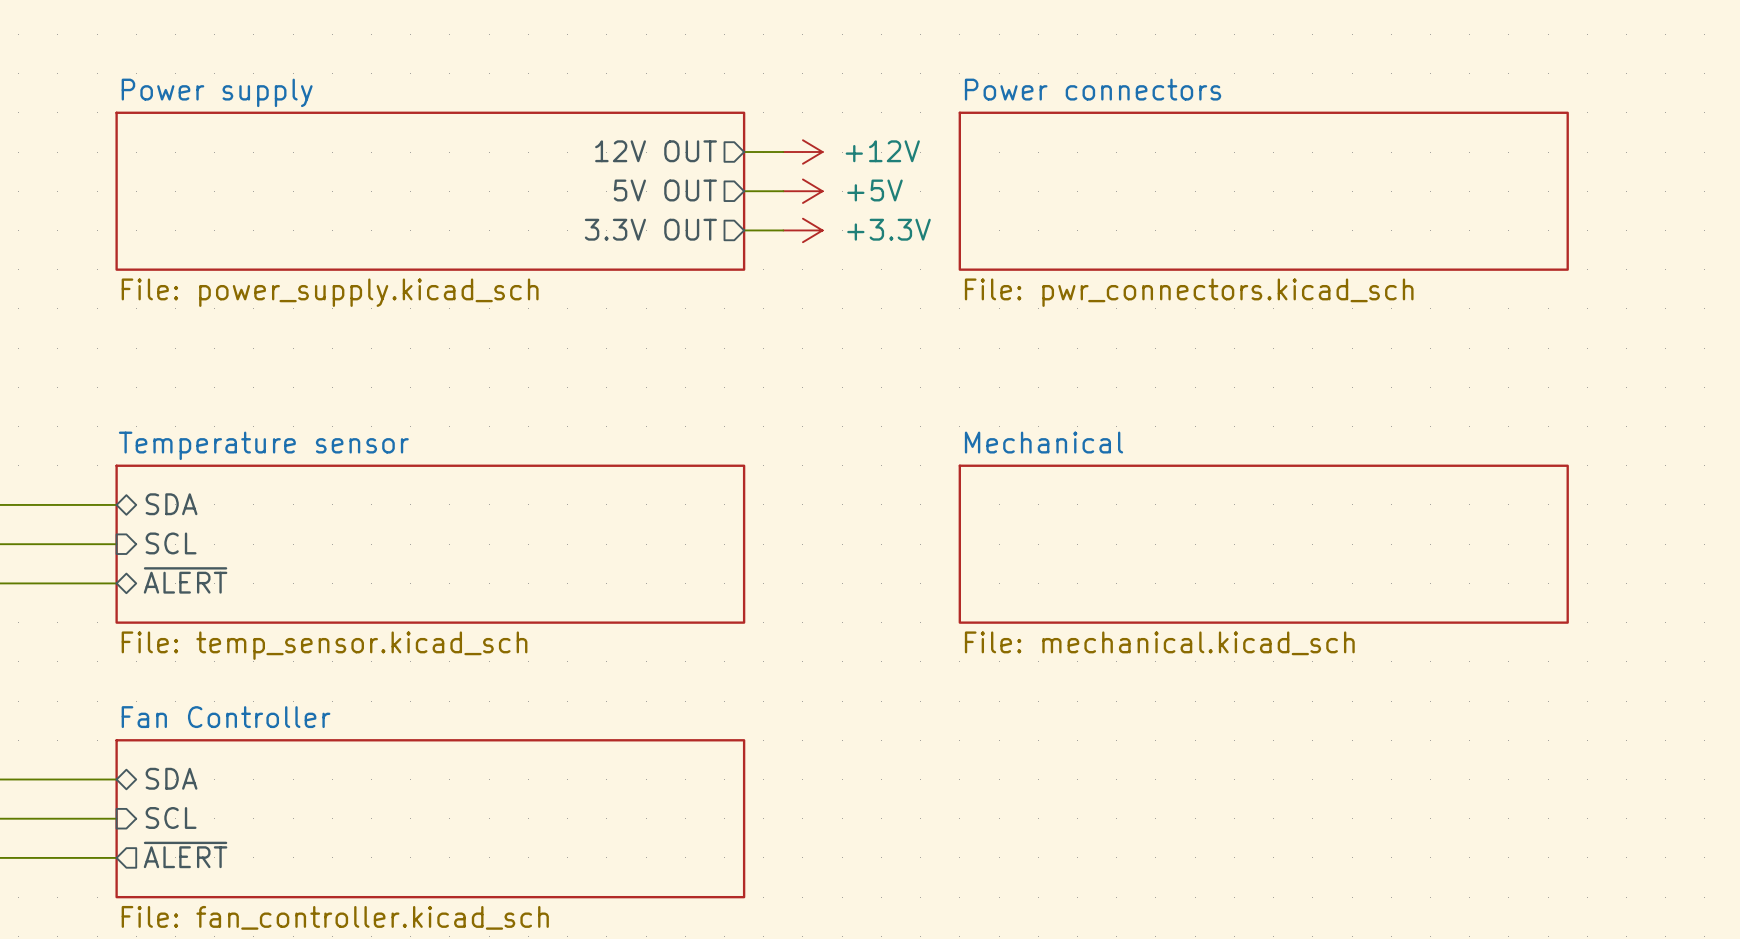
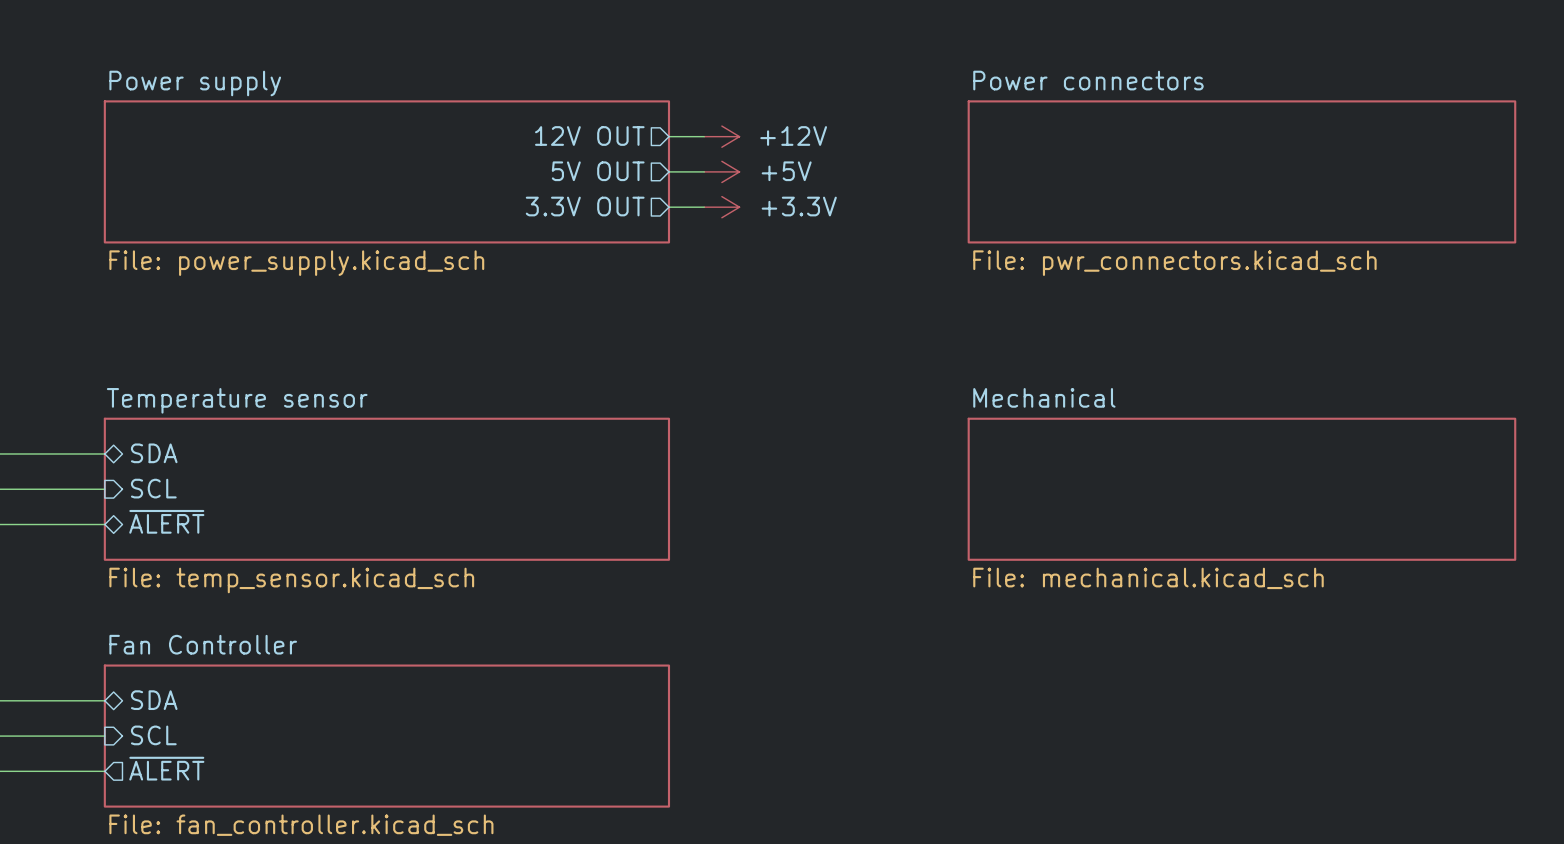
sheet Power connectors position: (1263, 191) -> (1241, 171)
sheet Mechanical position: (1263, 544) -> (1241, 489)

